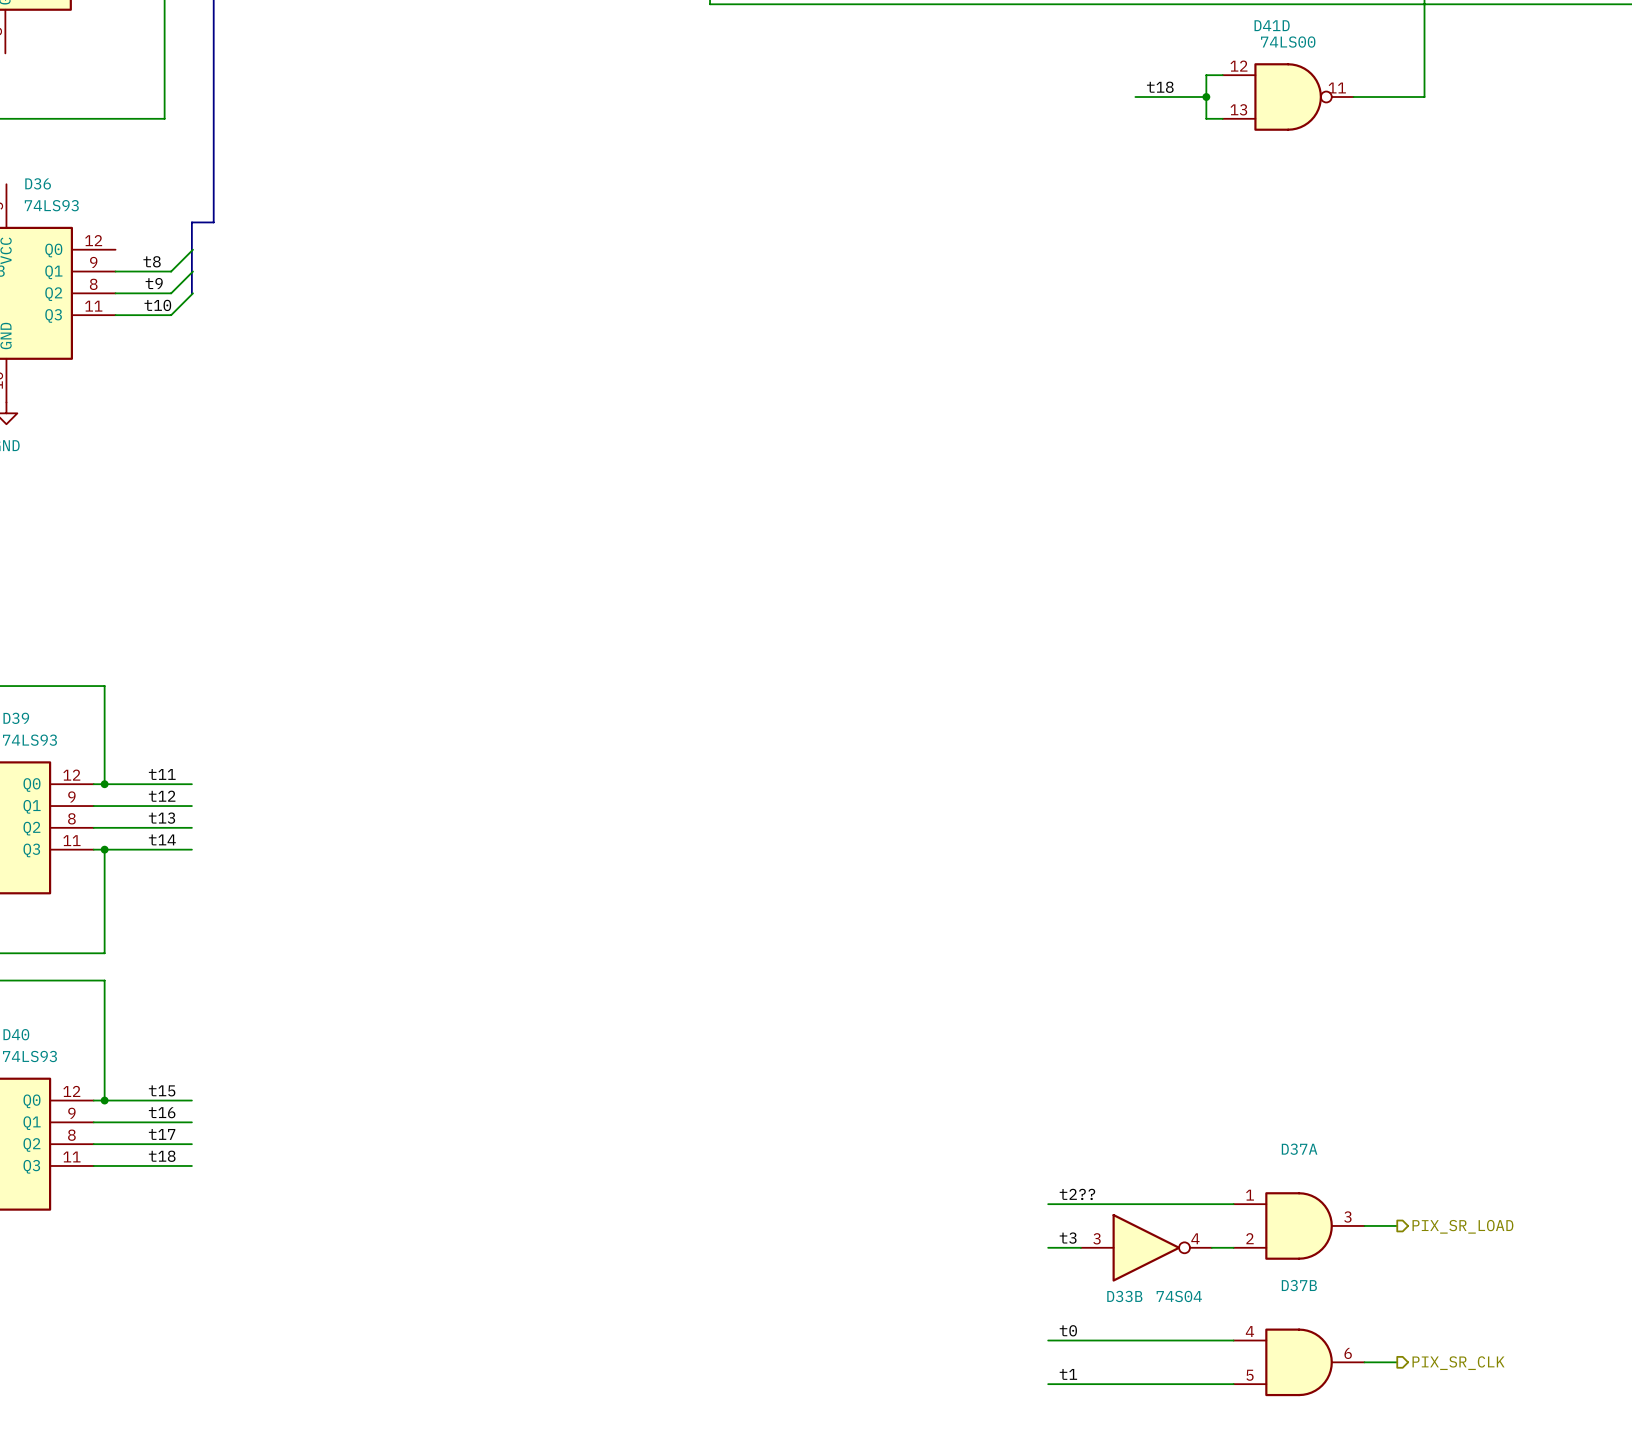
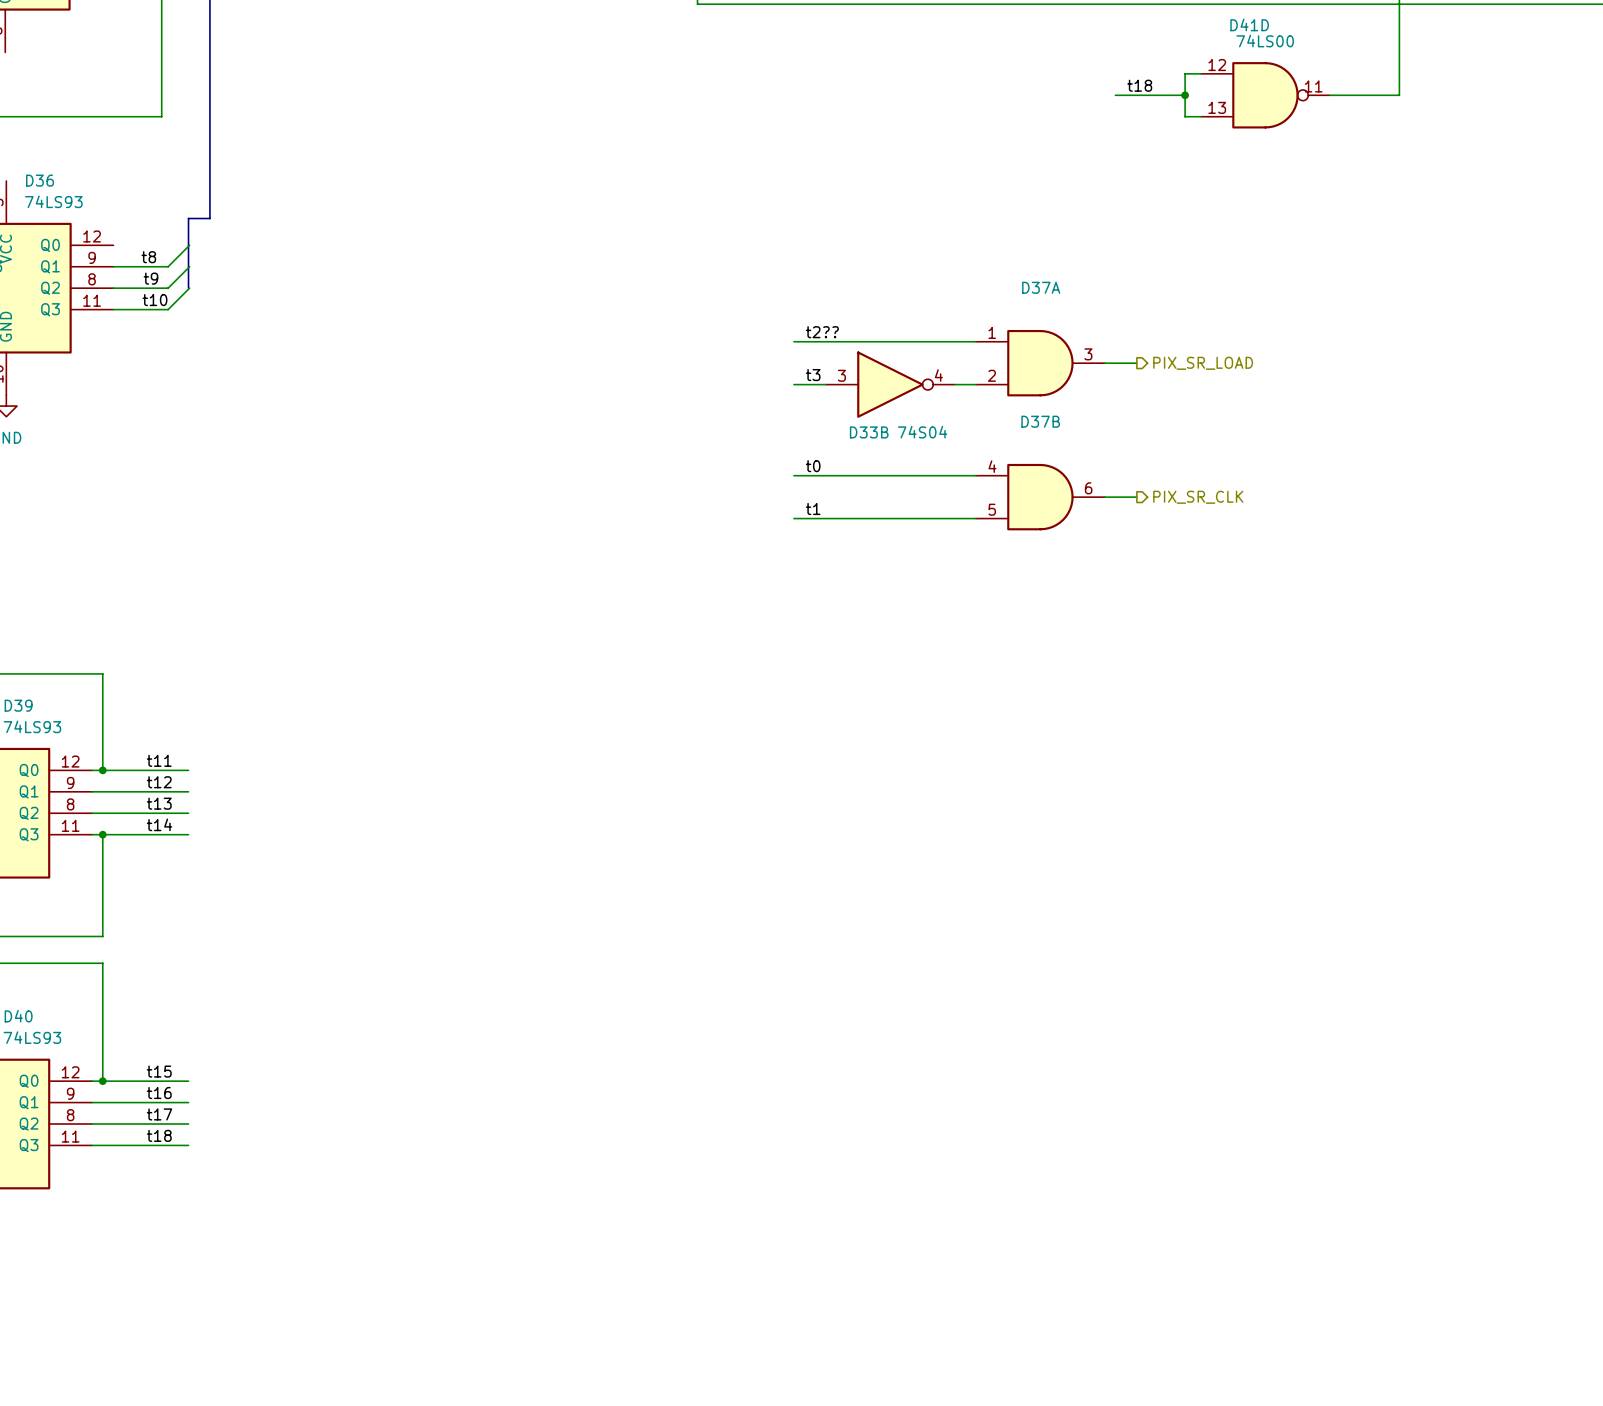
label: none -> t2?? (822, 332)
wire: none -> (793, 341) (976, 341)
wire: none -> (1104, 363) (1136, 363)
hierarchical label: none -> PIX_SR_LOAD (1203, 363)
label: none -> t3 (813, 375)
wire: none -> (793, 384) (826, 384)
wire: none -> (954, 384) (976, 384)
label: none -> t0 (813, 466)
wire: none -> (793, 475) (976, 475)
wire: none -> (1104, 497) (1136, 497)
hierarchical label: none -> PIX_SR_CLK (1198, 497)
label: none -> t1 (813, 509)
wire: none -> (793, 518) (976, 518)
label: t2?? (1077, 1194) -> none
wire: (1048, 1204) (1233, 1204) -> none
D37A position: (1299, 1225) -> (1040, 363)
wire: (1364, 1225) (1397, 1225) -> none
hierarchical label: PIX_SR_LOAD (1462, 1226) -> none
label: t3 (1068, 1238) -> none
wire: (1048, 1247) (1080, 1247) -> none
D33B position: (1146, 1247) -> (890, 384)
wire: (1211, 1247) (1233, 1247) -> none
label: t0 (1068, 1330) -> none
wire: (1048, 1340) (1233, 1340) -> none
D37B position: (1299, 1362) -> (1040, 497)
wire: (1364, 1362) (1397, 1362) -> none
hierarchical label: PIX_SR_CLK (1458, 1363) -> none
label: t1 (1068, 1374) -> none
wire: (1048, 1384) (1233, 1384) -> none

